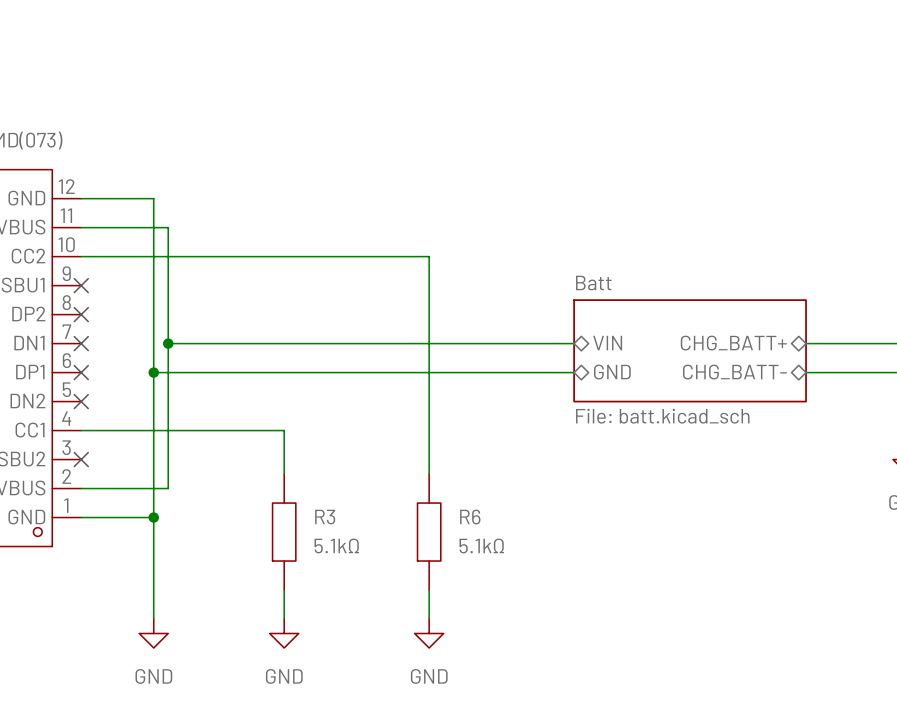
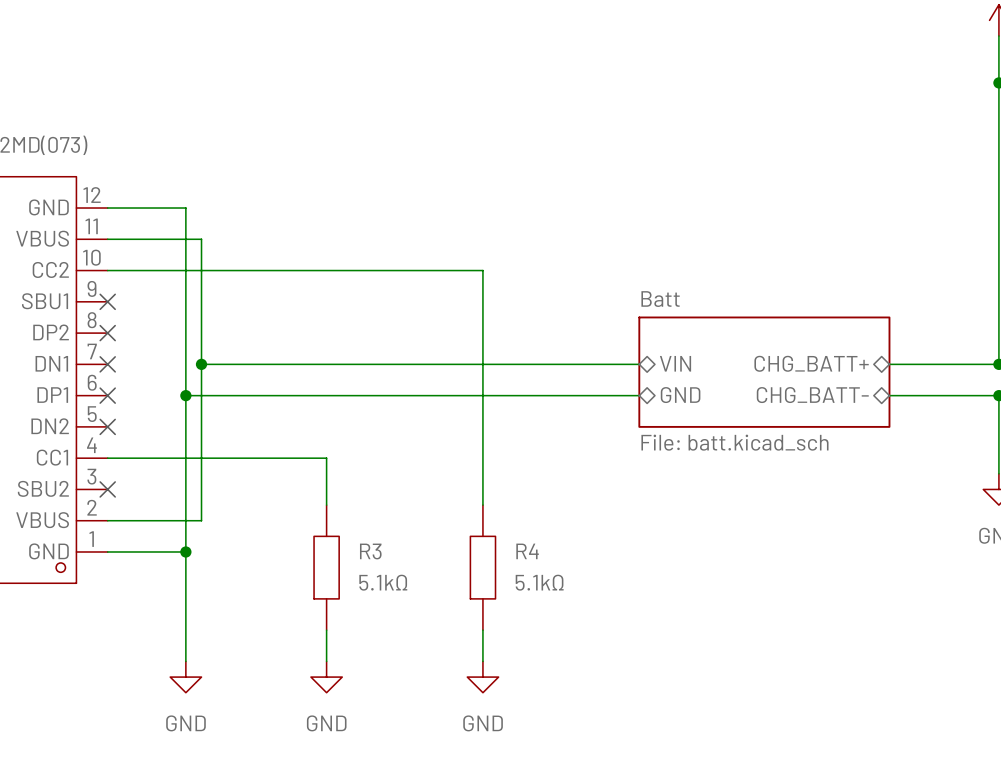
R6 name: R6 (470, 516) -> R4 (527, 551)

